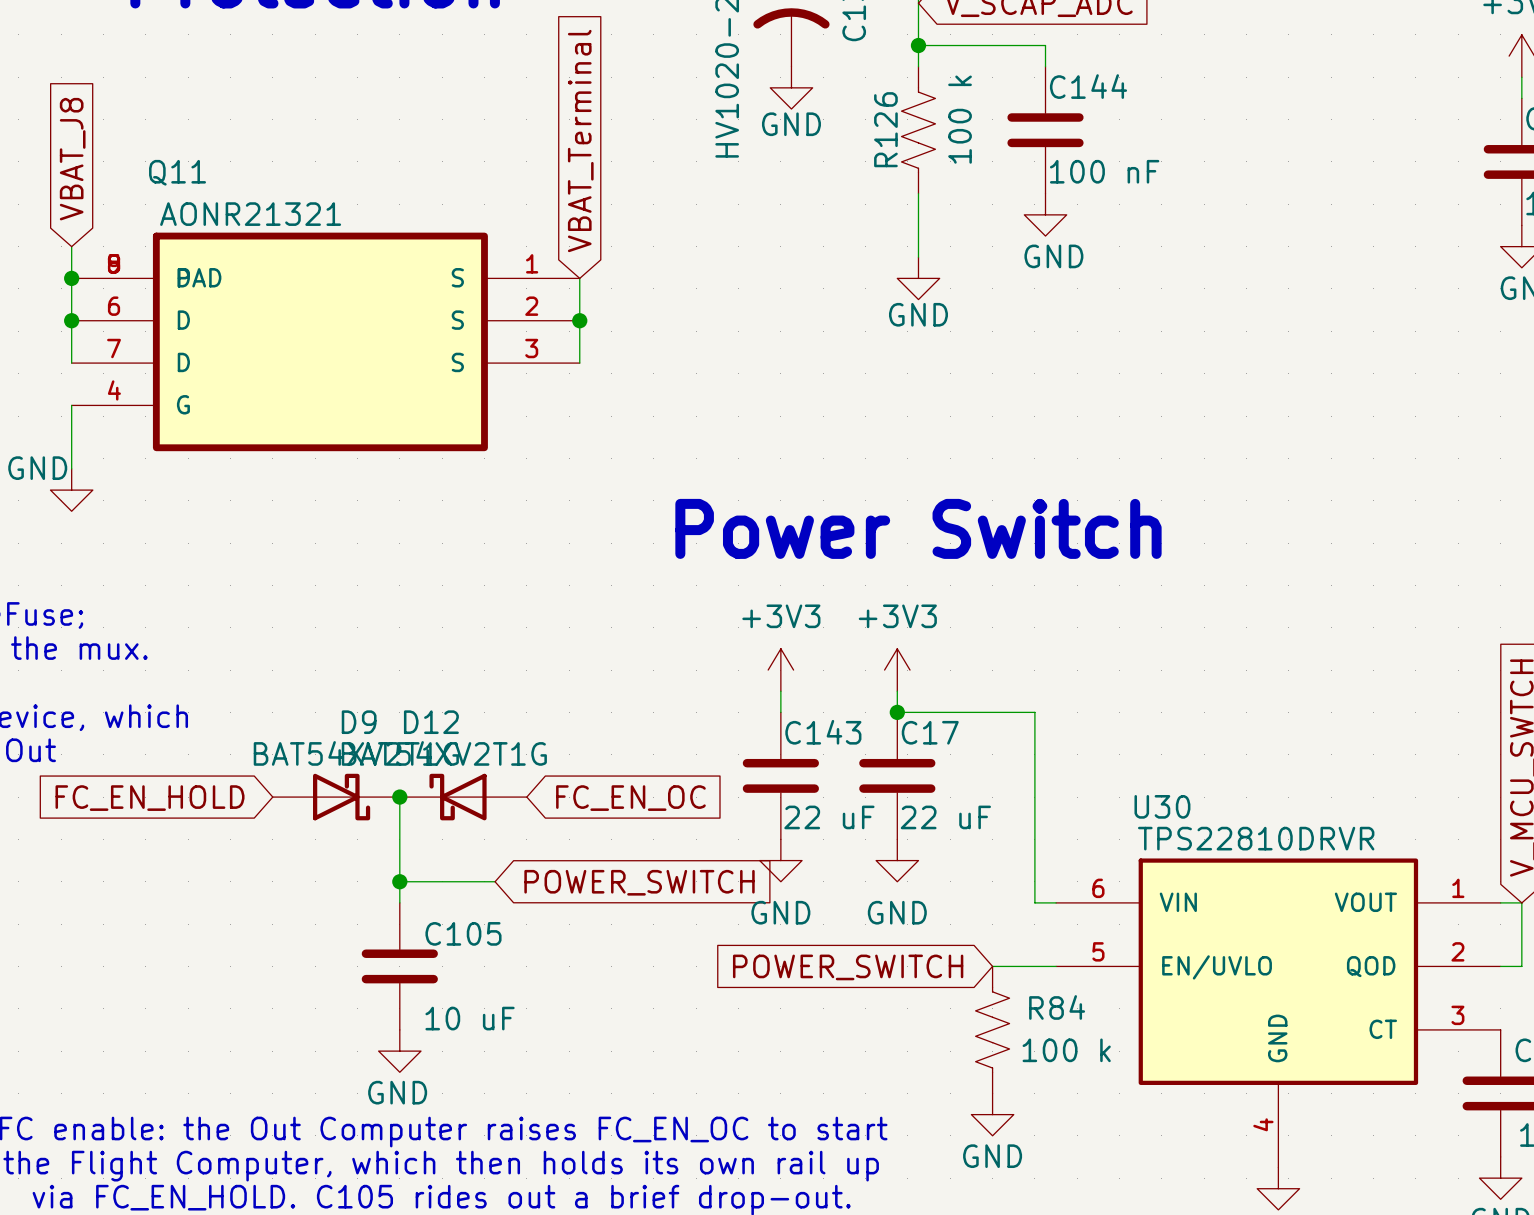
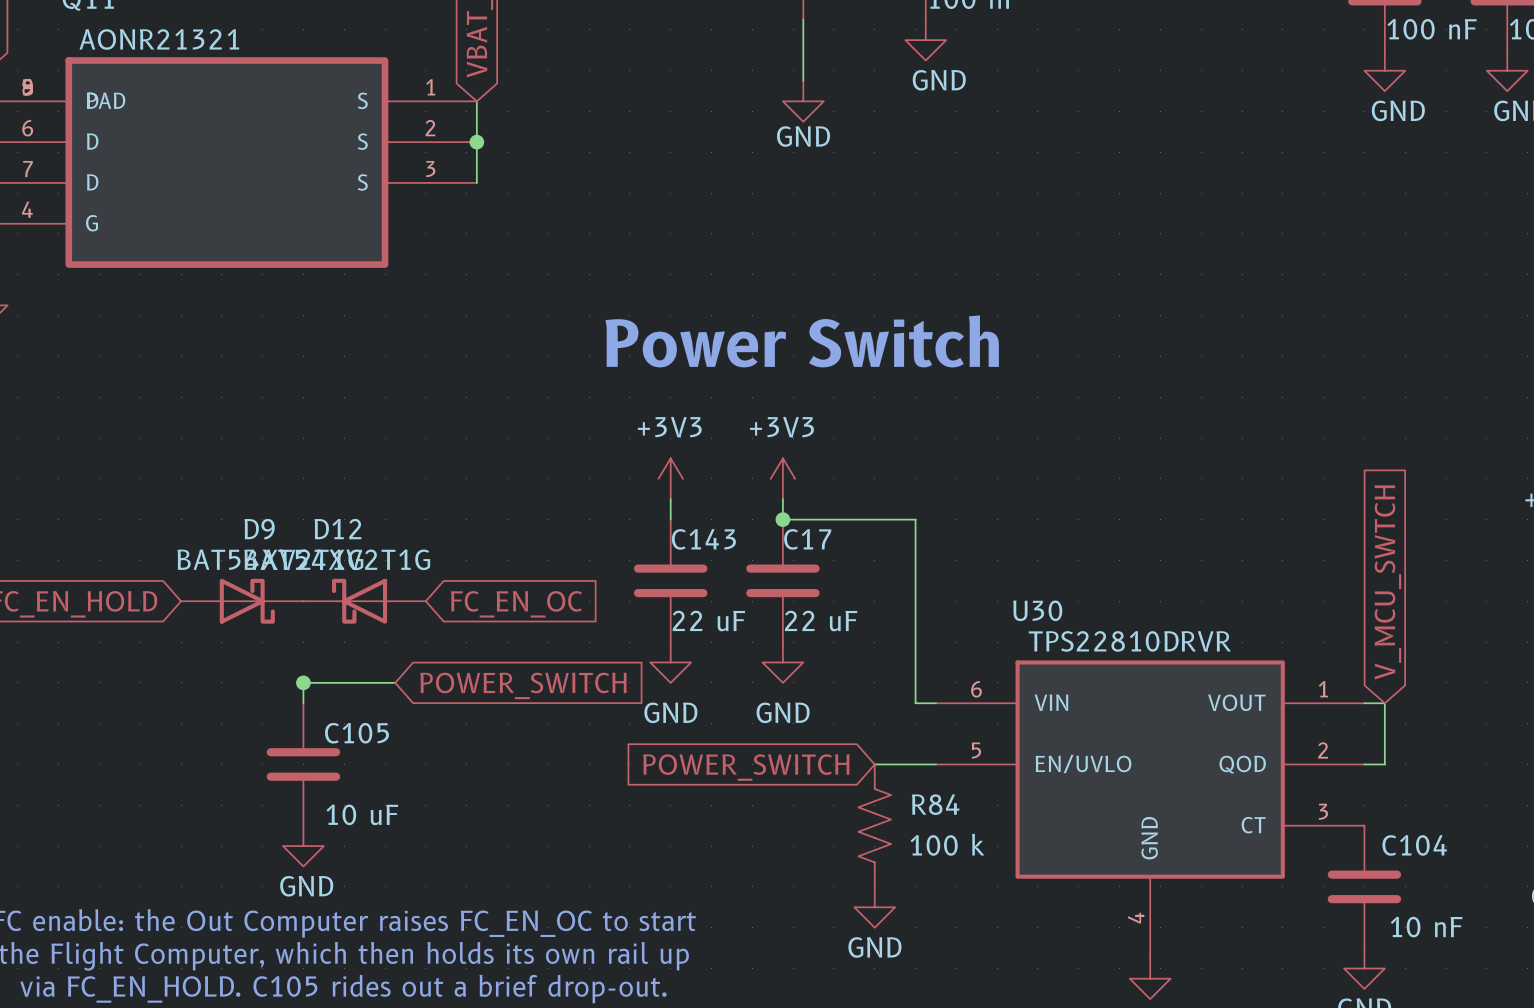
wire: (399, 797) (399, 881) -> none
junction: (399, 797) -> none

